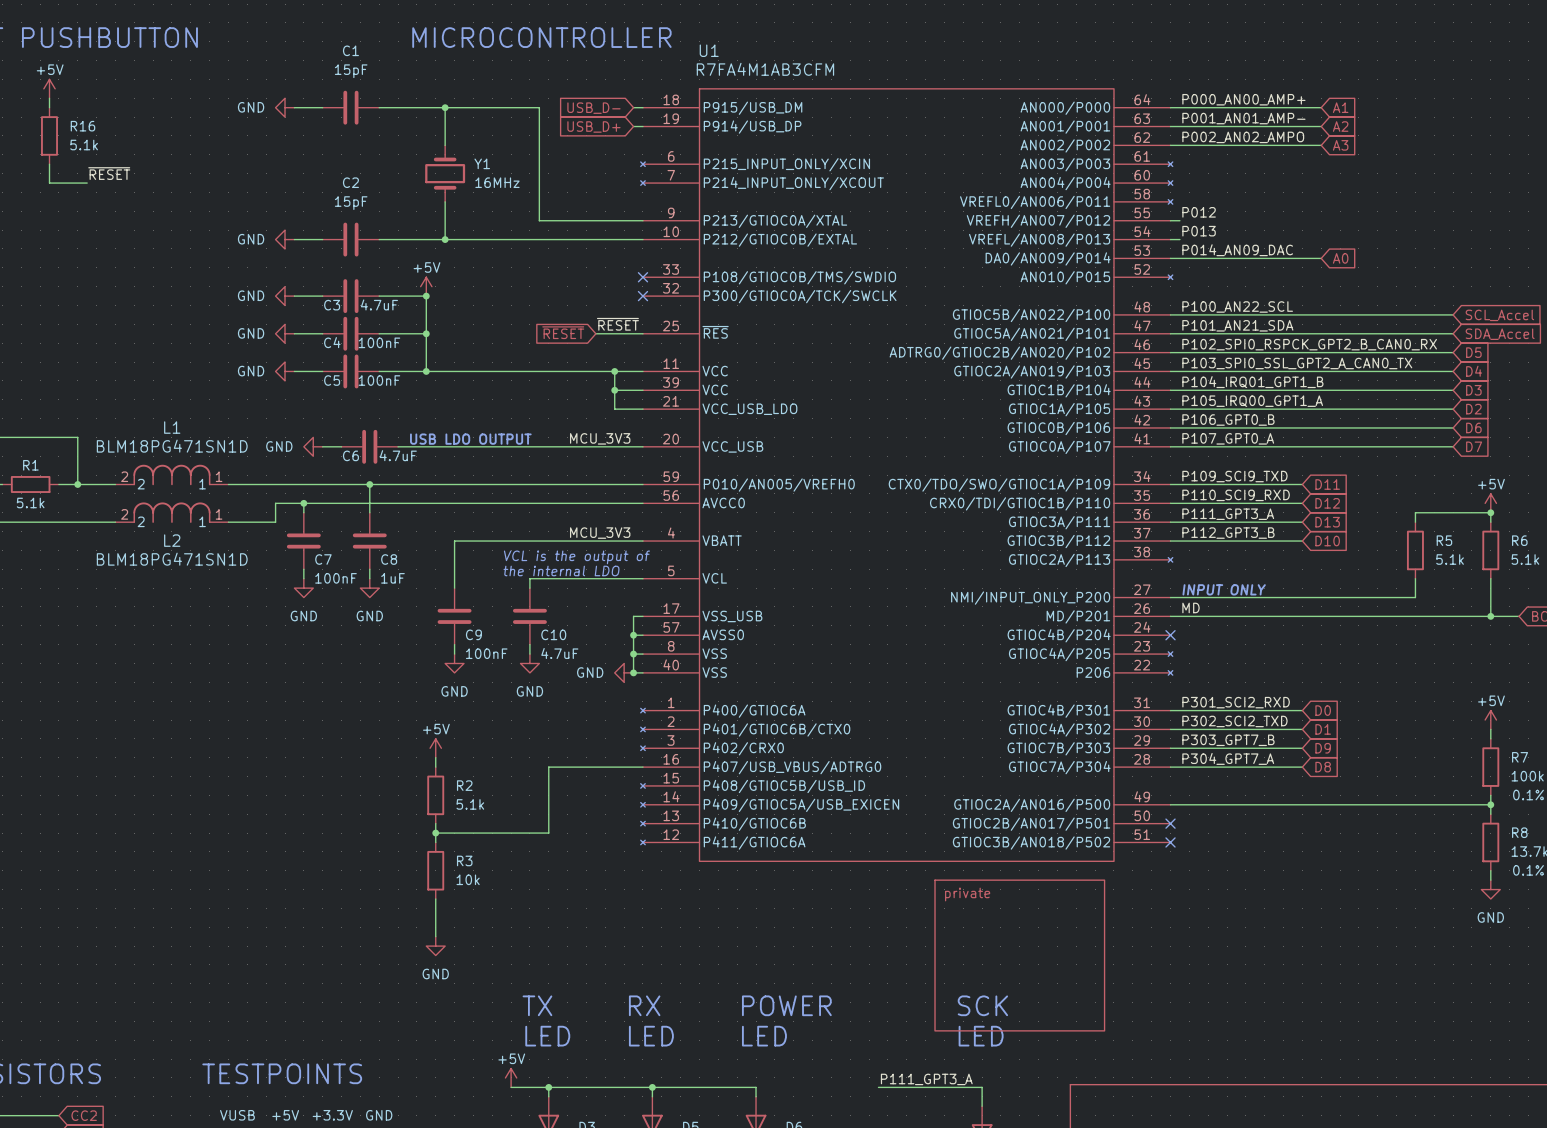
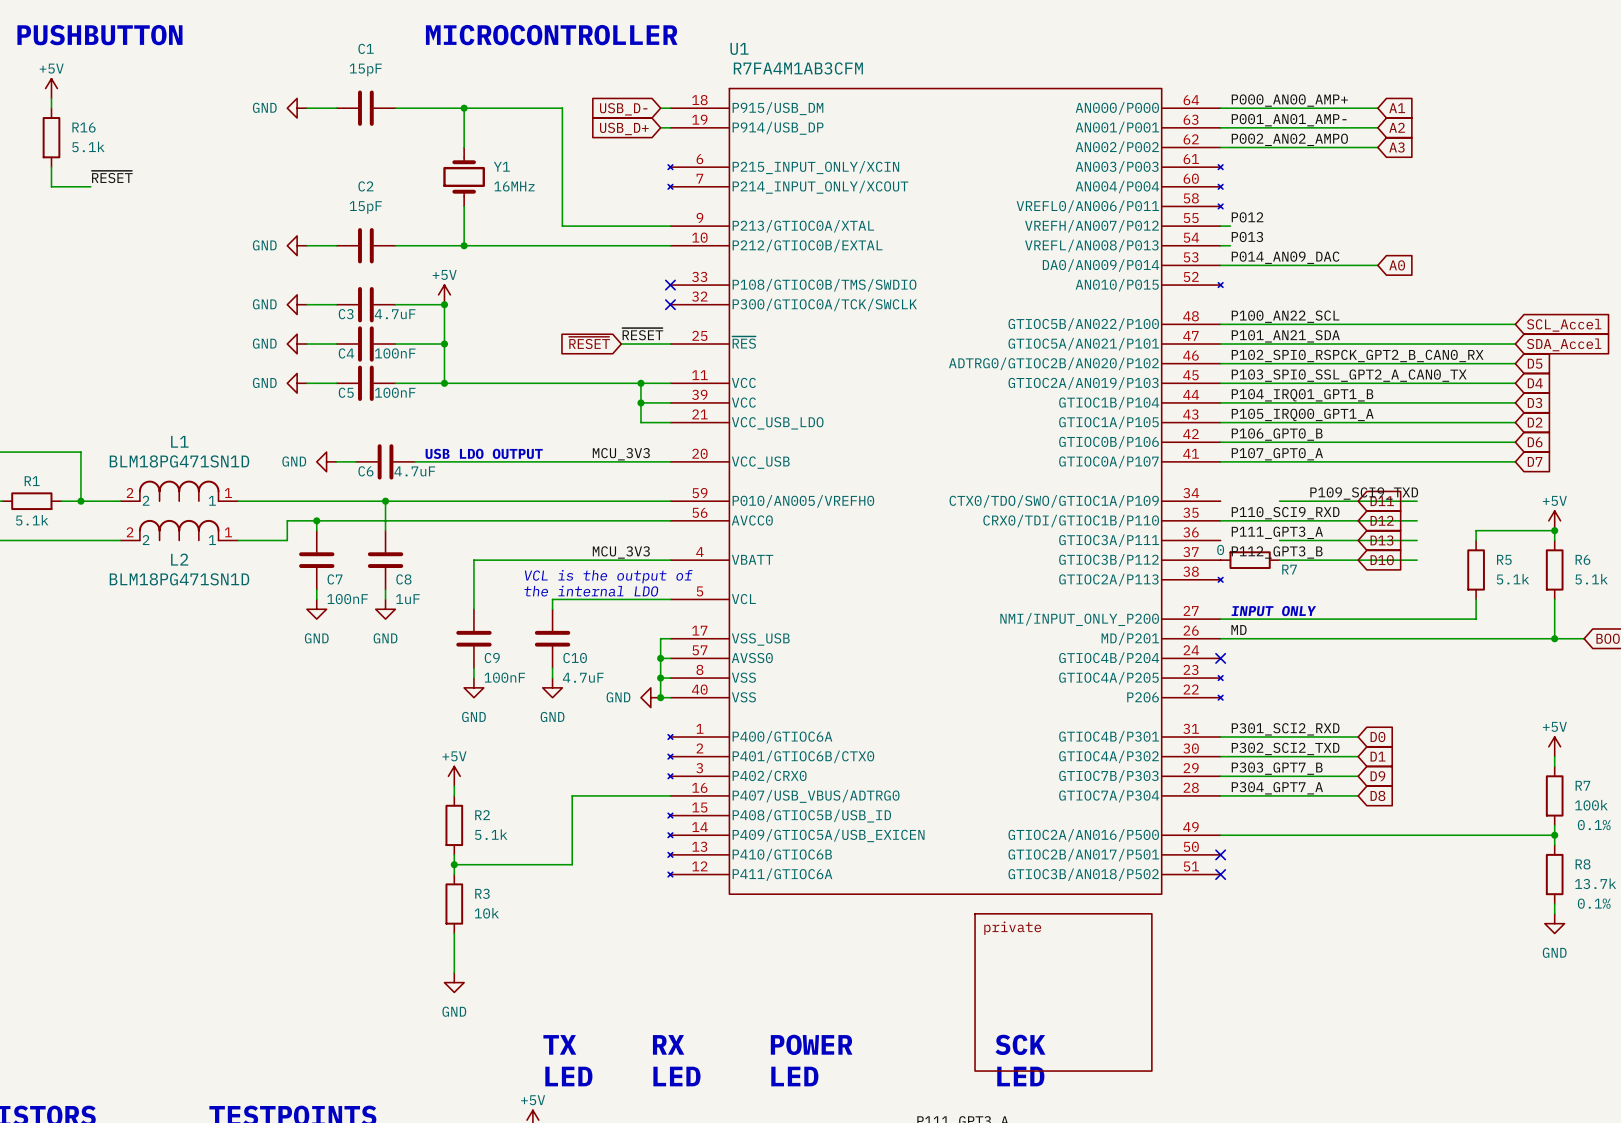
label position: P109_SCI9_TXD (1234, 476) -> P109_SCI9_TXD (1364, 493)
wire: (1170, 484) (1227, 484) -> (1358, 501) (1417, 501)
wire: none -> (1358, 520) (1417, 520)
wire: (1170, 522) (1227, 522) -> (1358, 540) (1417, 540)
wire: (1170, 541) (1227, 541) -> (1358, 560) (1417, 560)
R7: none -> 0 (1250, 560)

